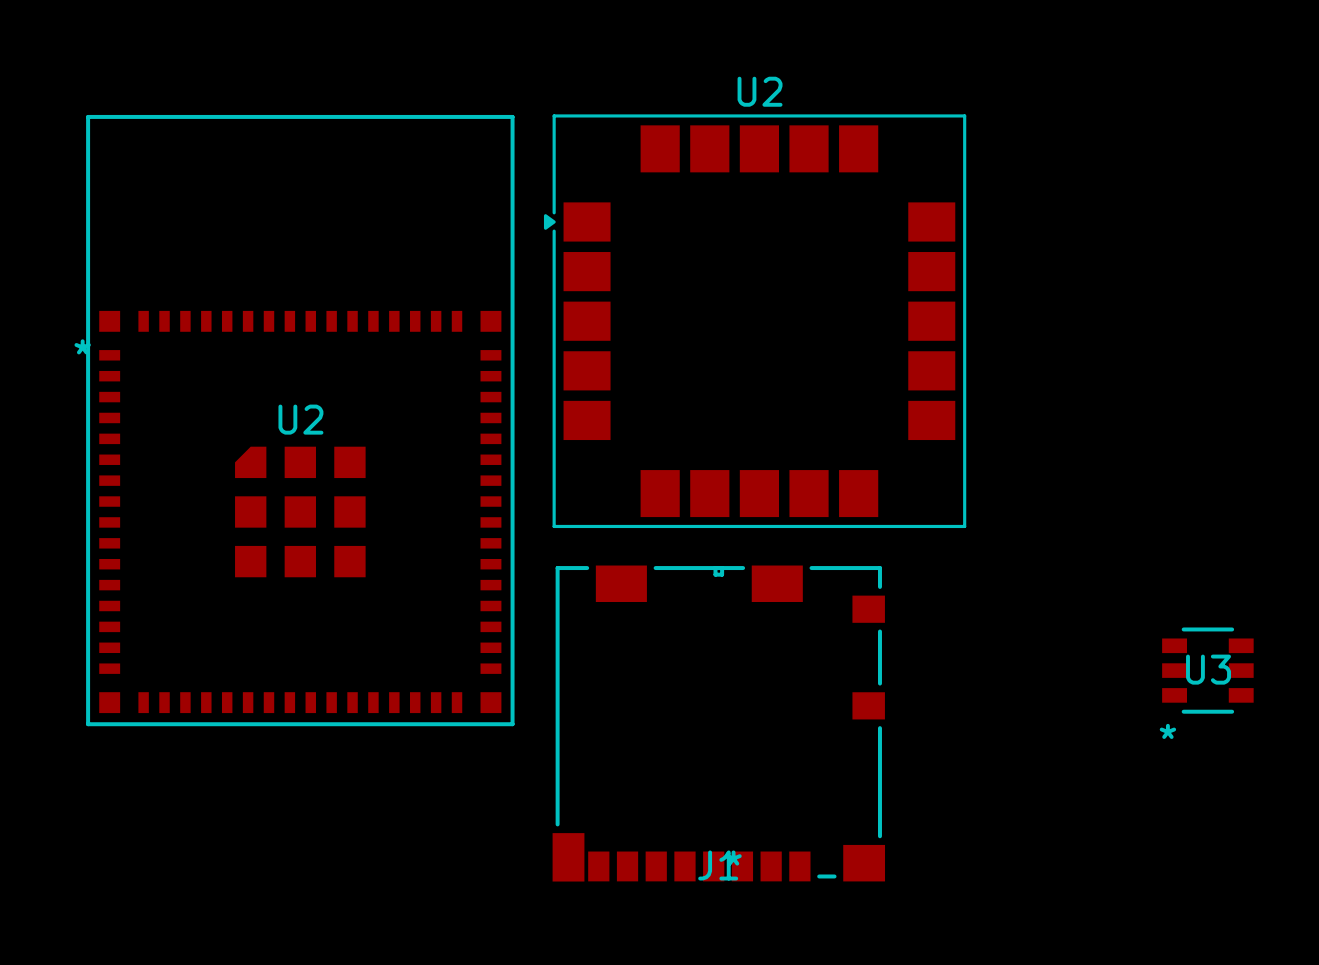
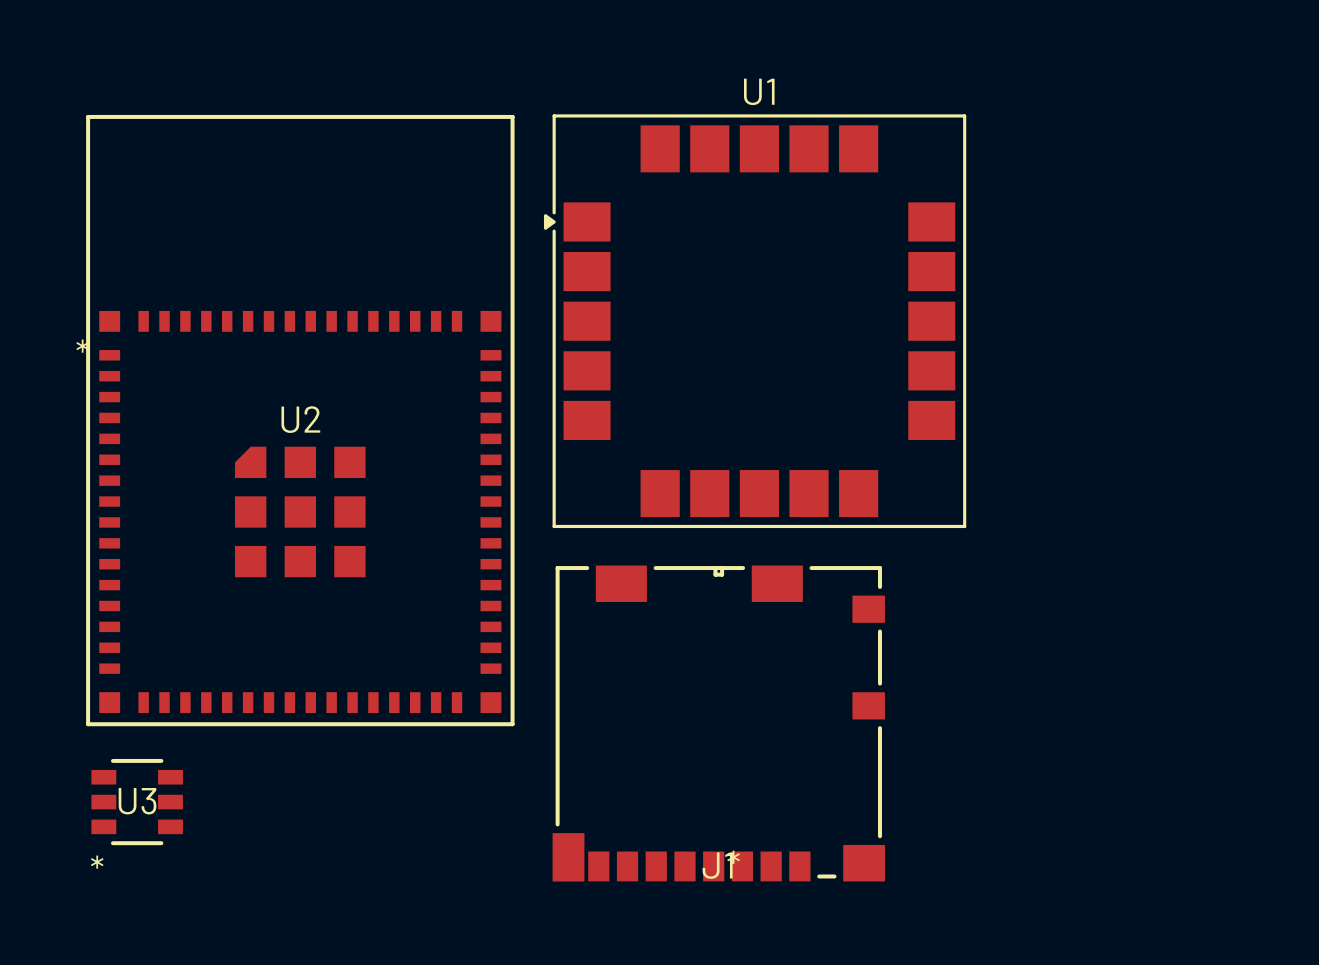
U2 name: U2 (760, 91) -> U1 (759, 91)
U3 position: (1207, 670) -> (137, 802)

